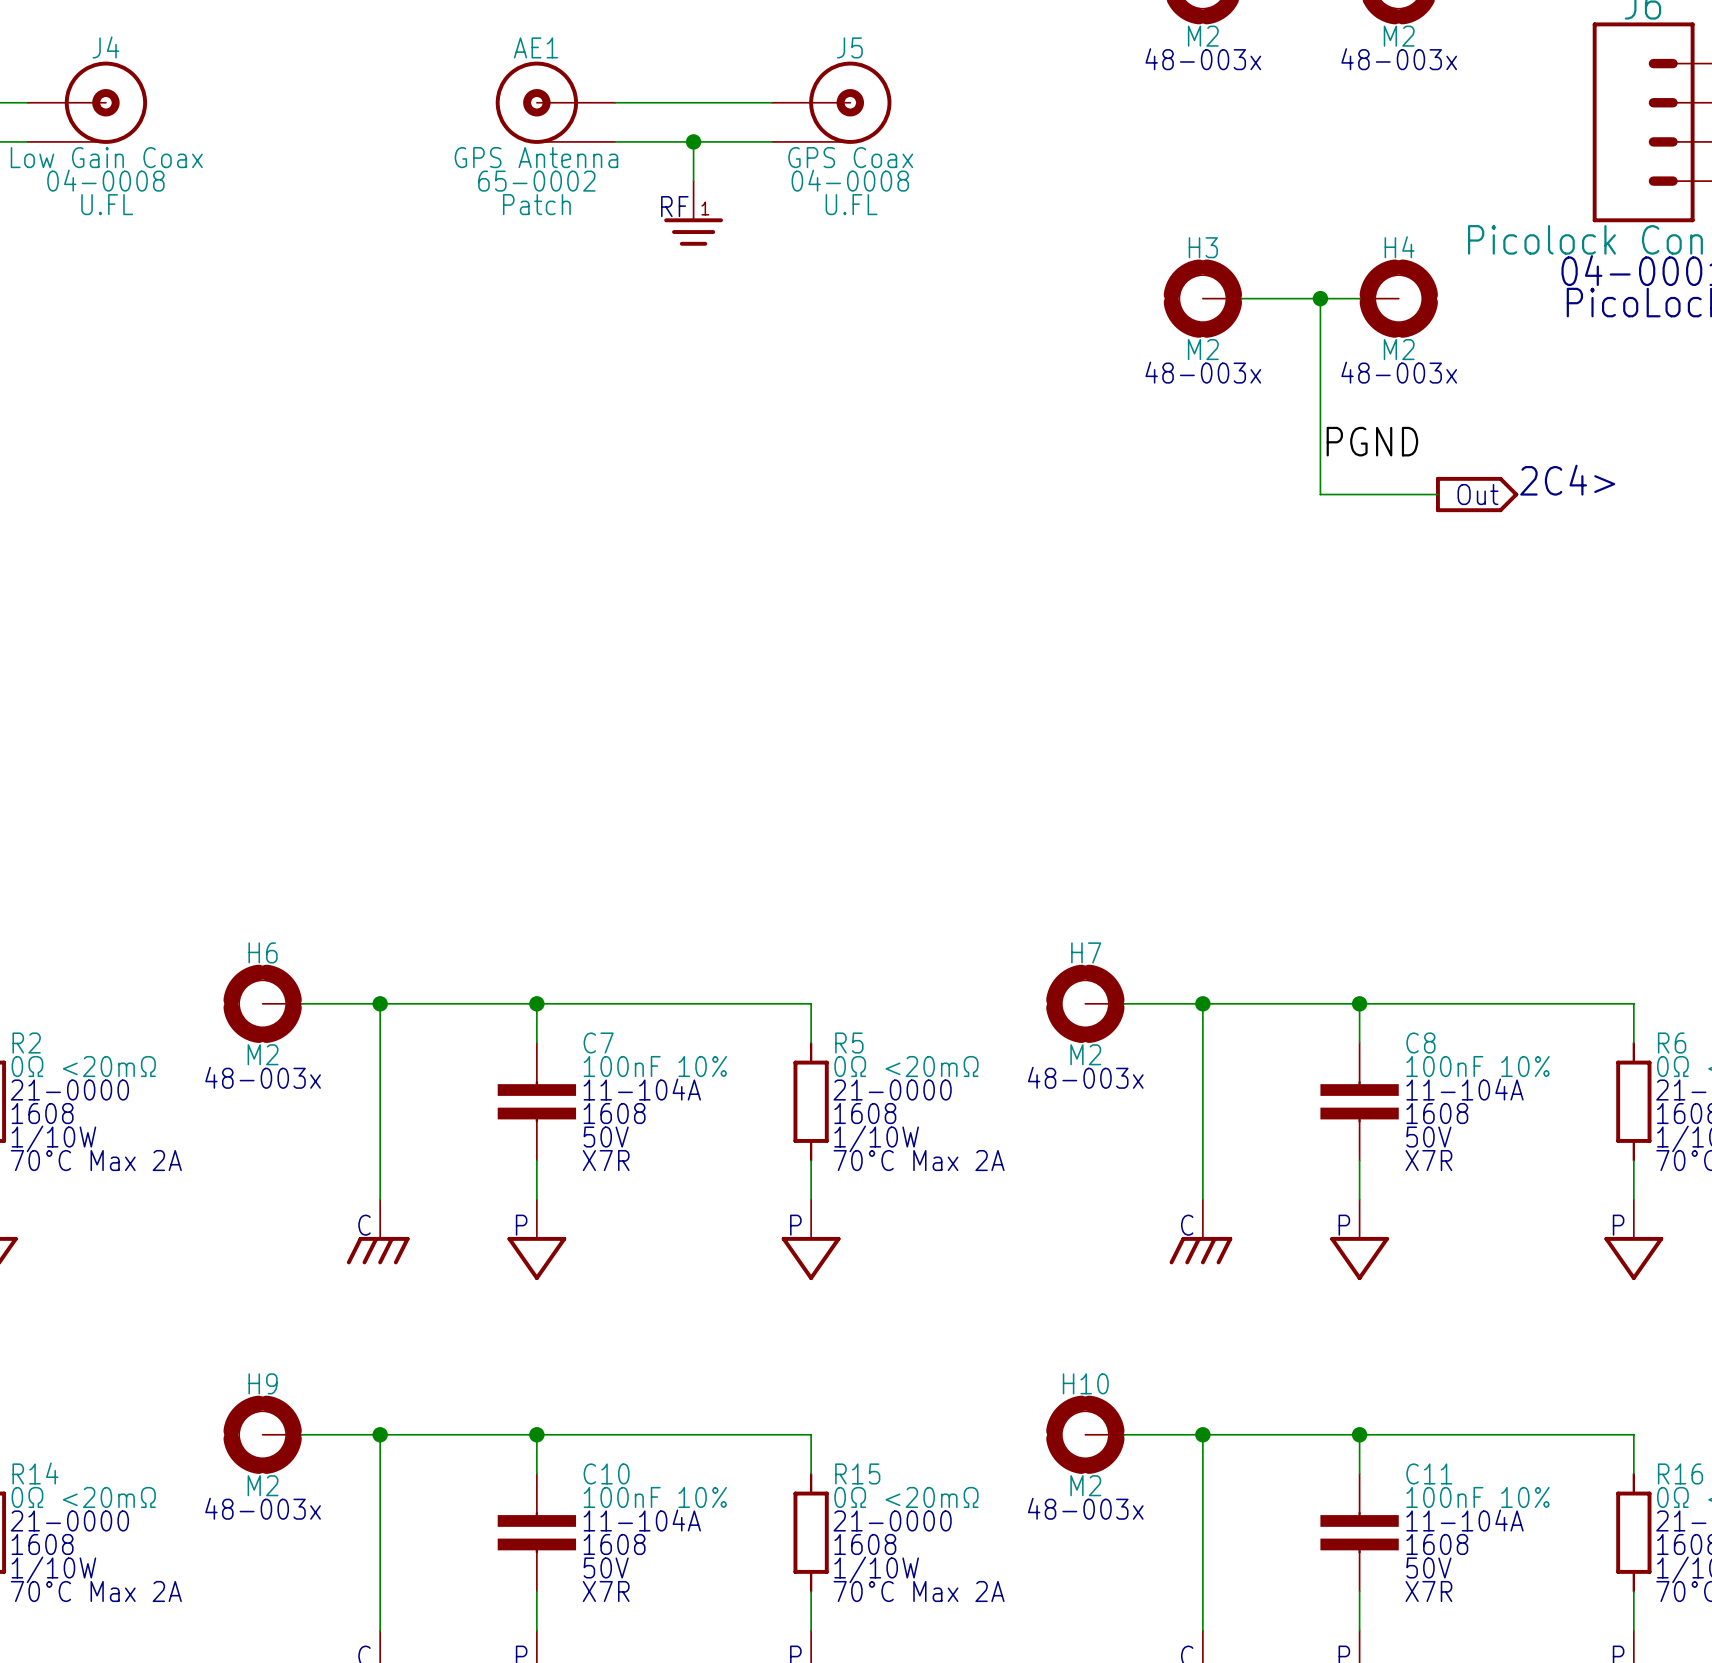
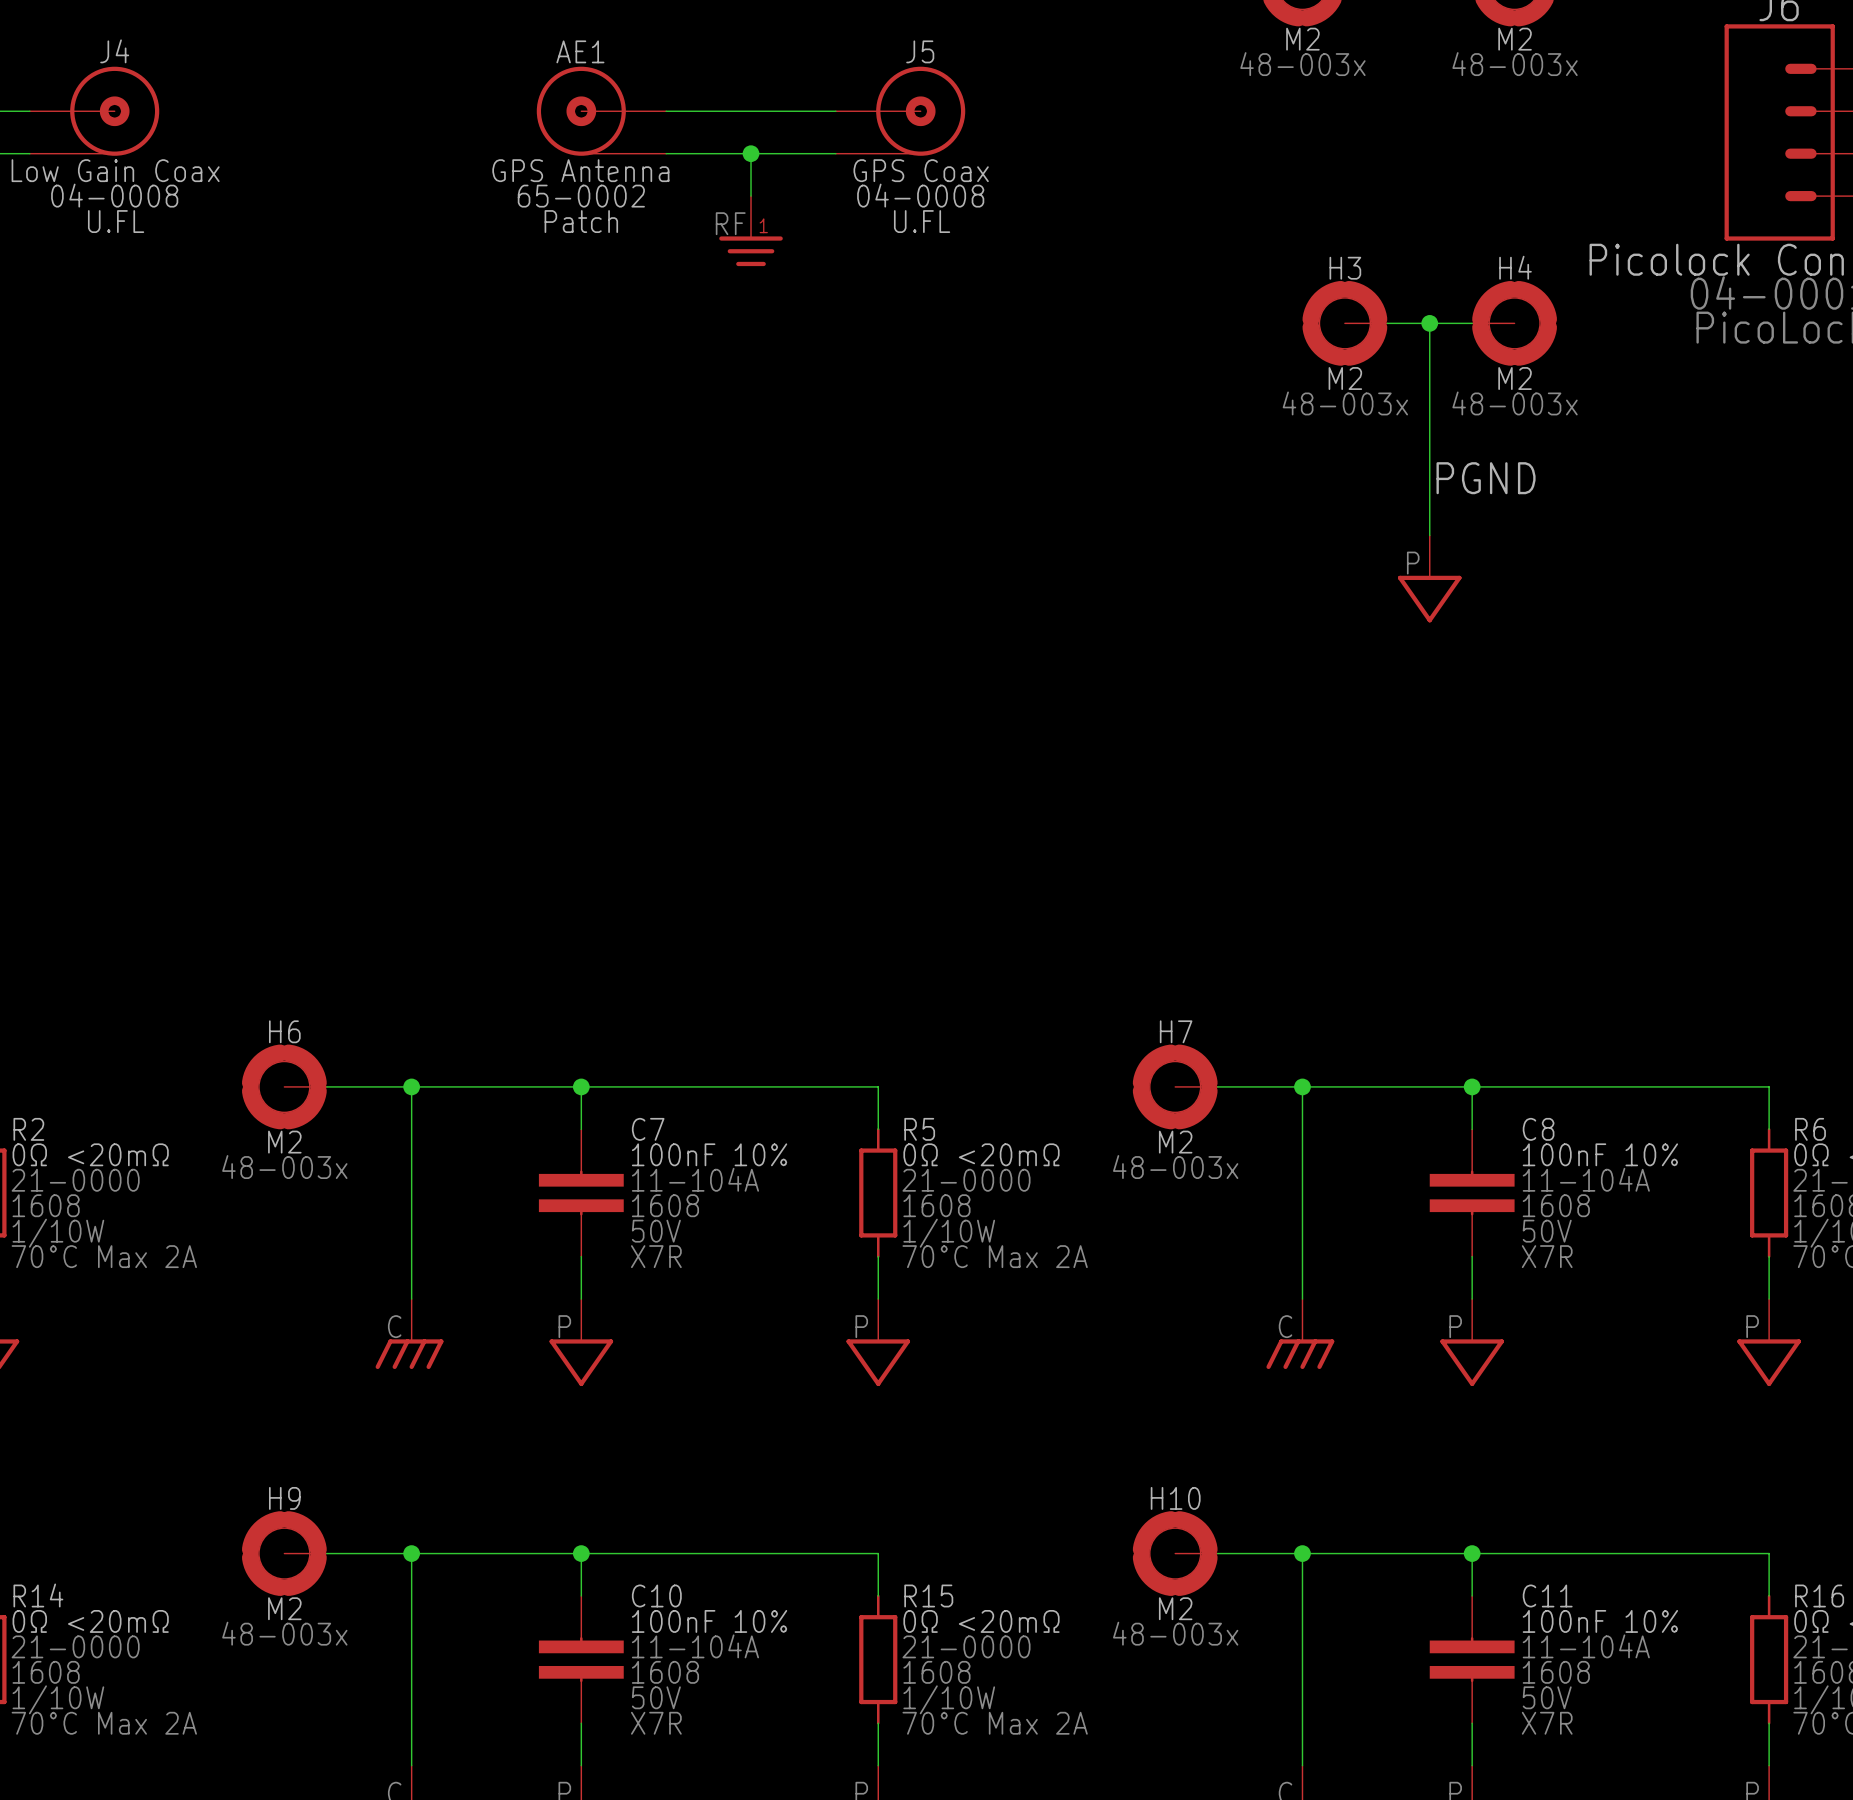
H3 position: (1202, 298) -> (1344, 323)
text: 2C4> (1567, 480) -> none
wire: (1320, 494) (1437, 494) -> none
part: (1477, 494) -> none
power symbol: none -> (1429, 578)

